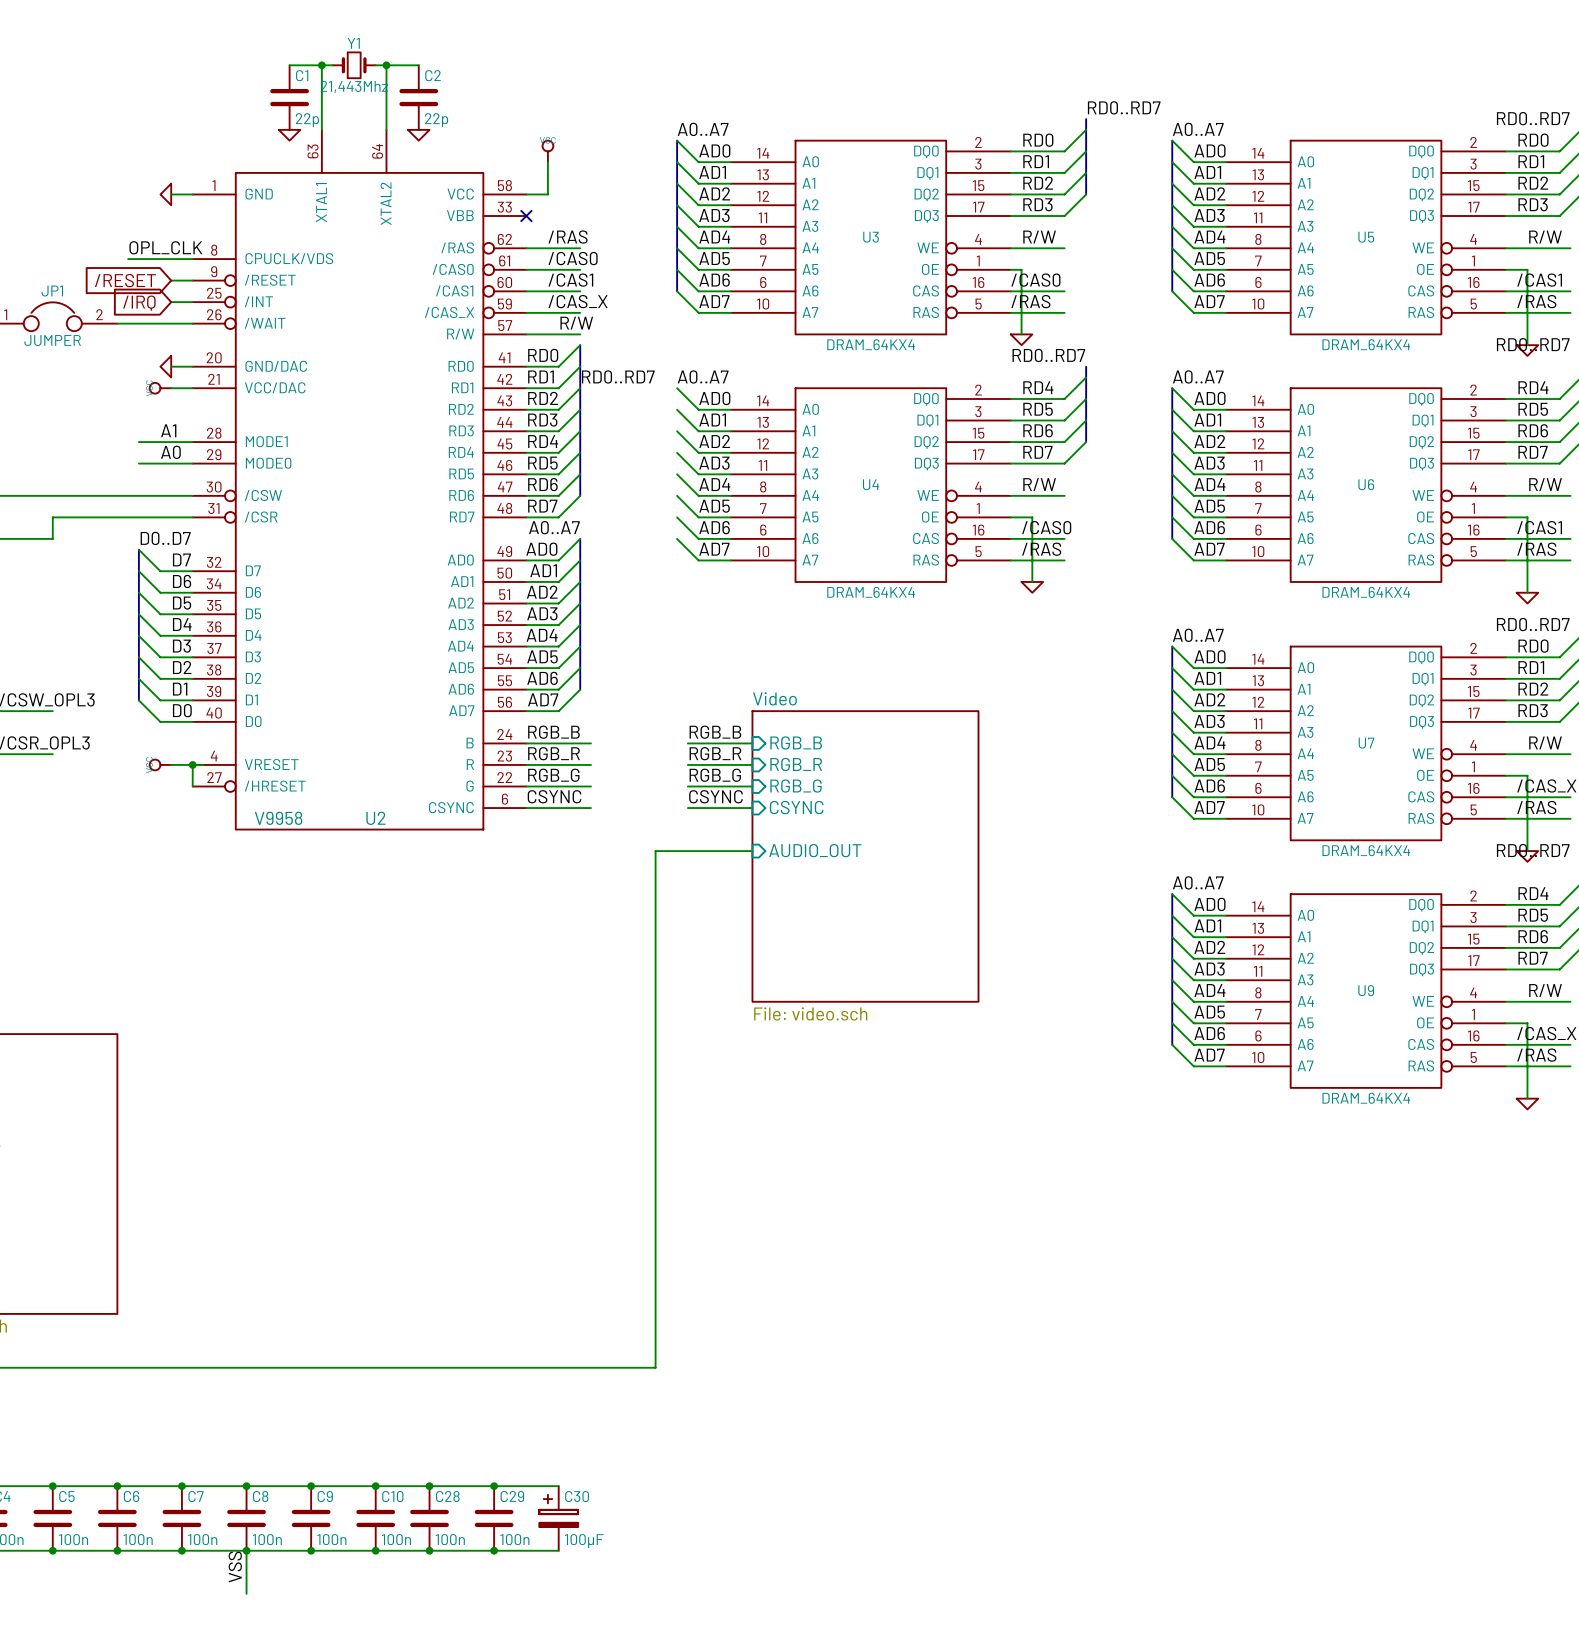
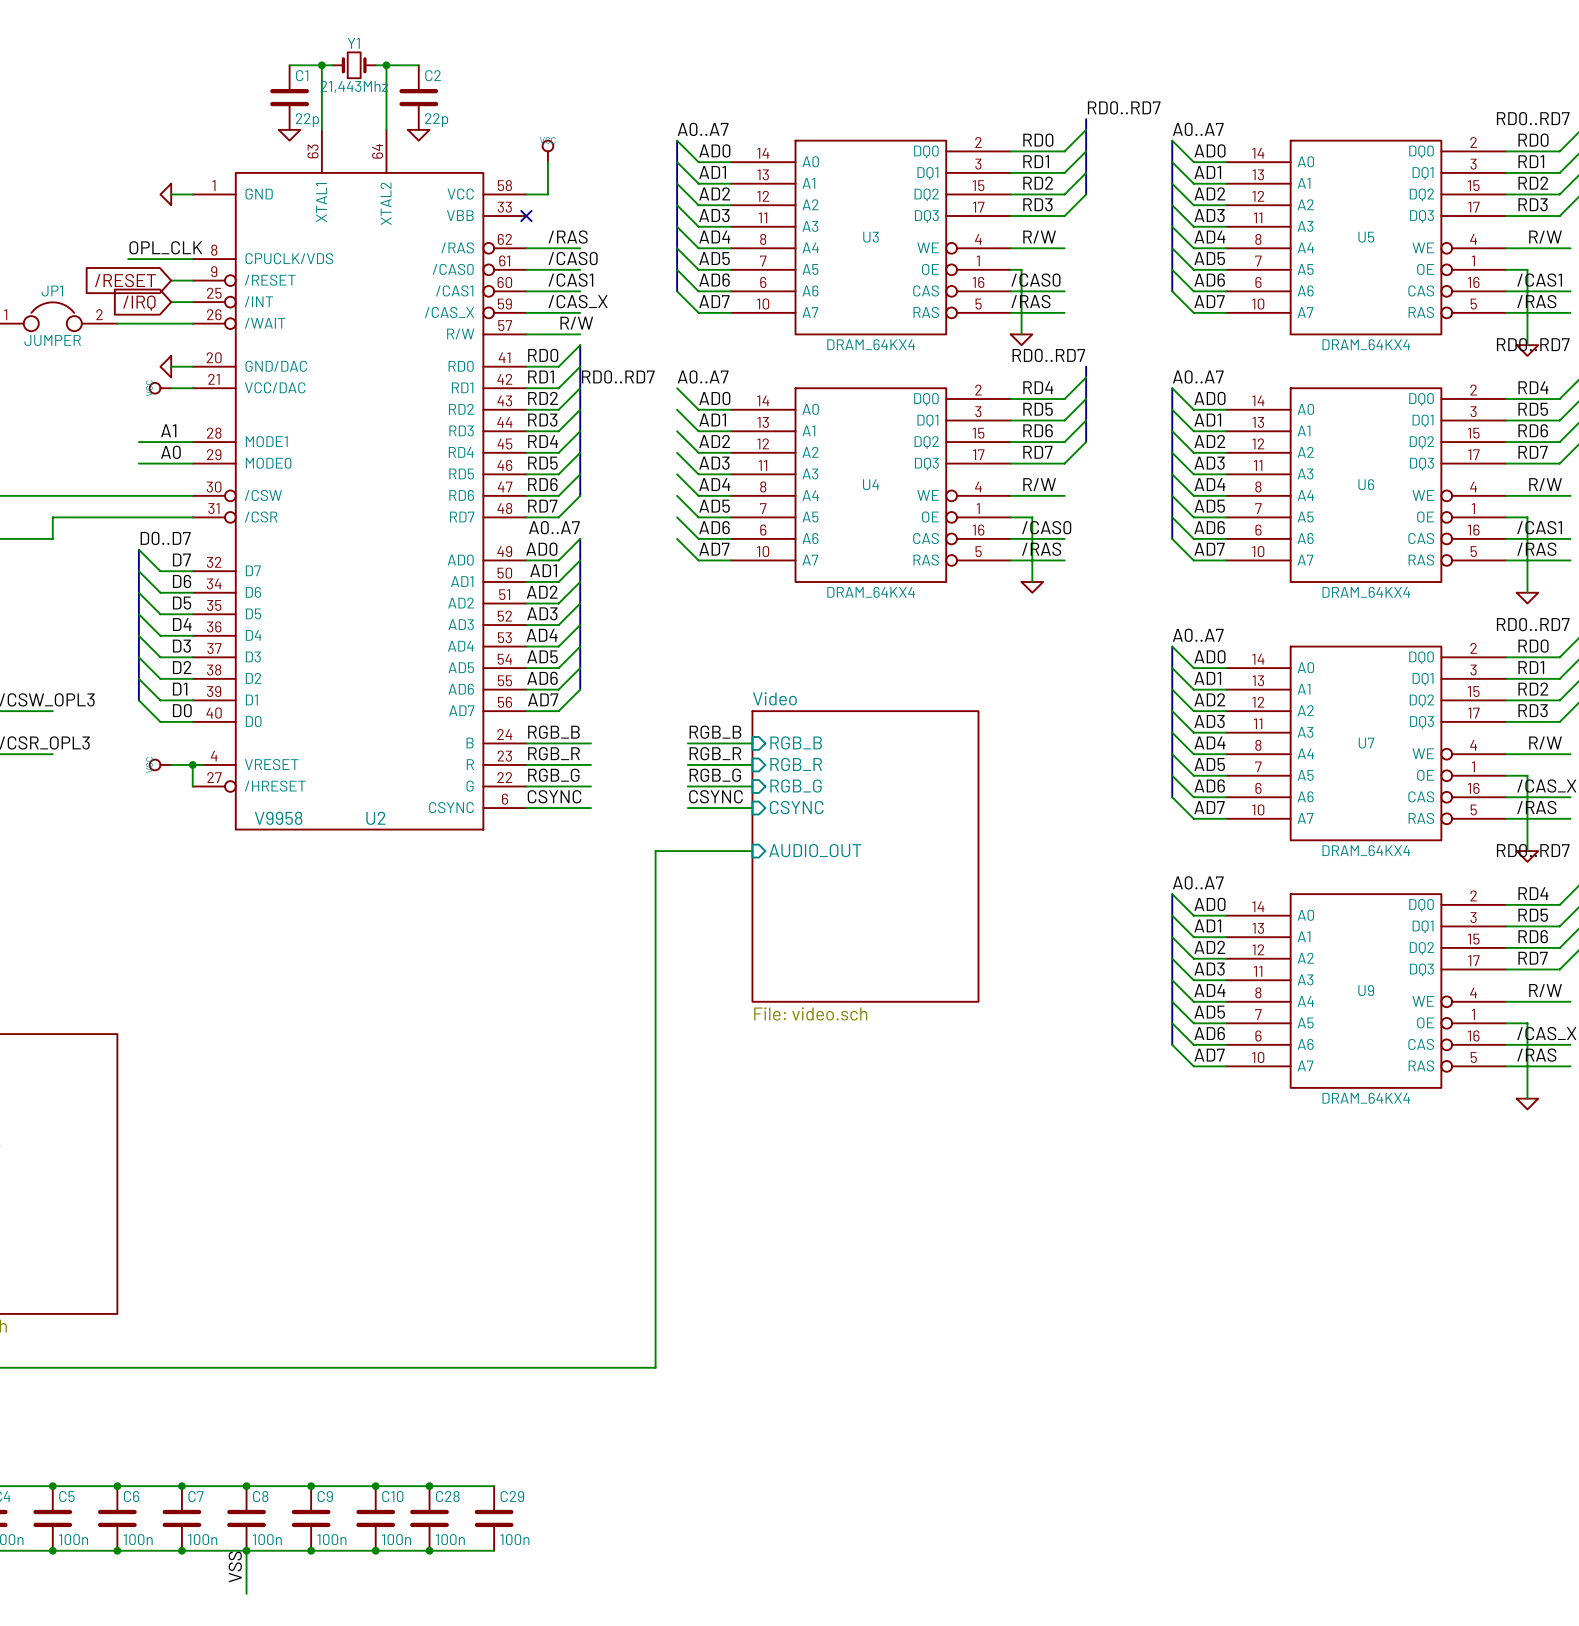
wire: (494, 1486) (558, 1486) -> none
junction: (494, 1486) -> none
C30: 100µF (558, 1518) -> none
wire: (494, 1550) (558, 1550) -> none
junction: (494, 1550) -> none

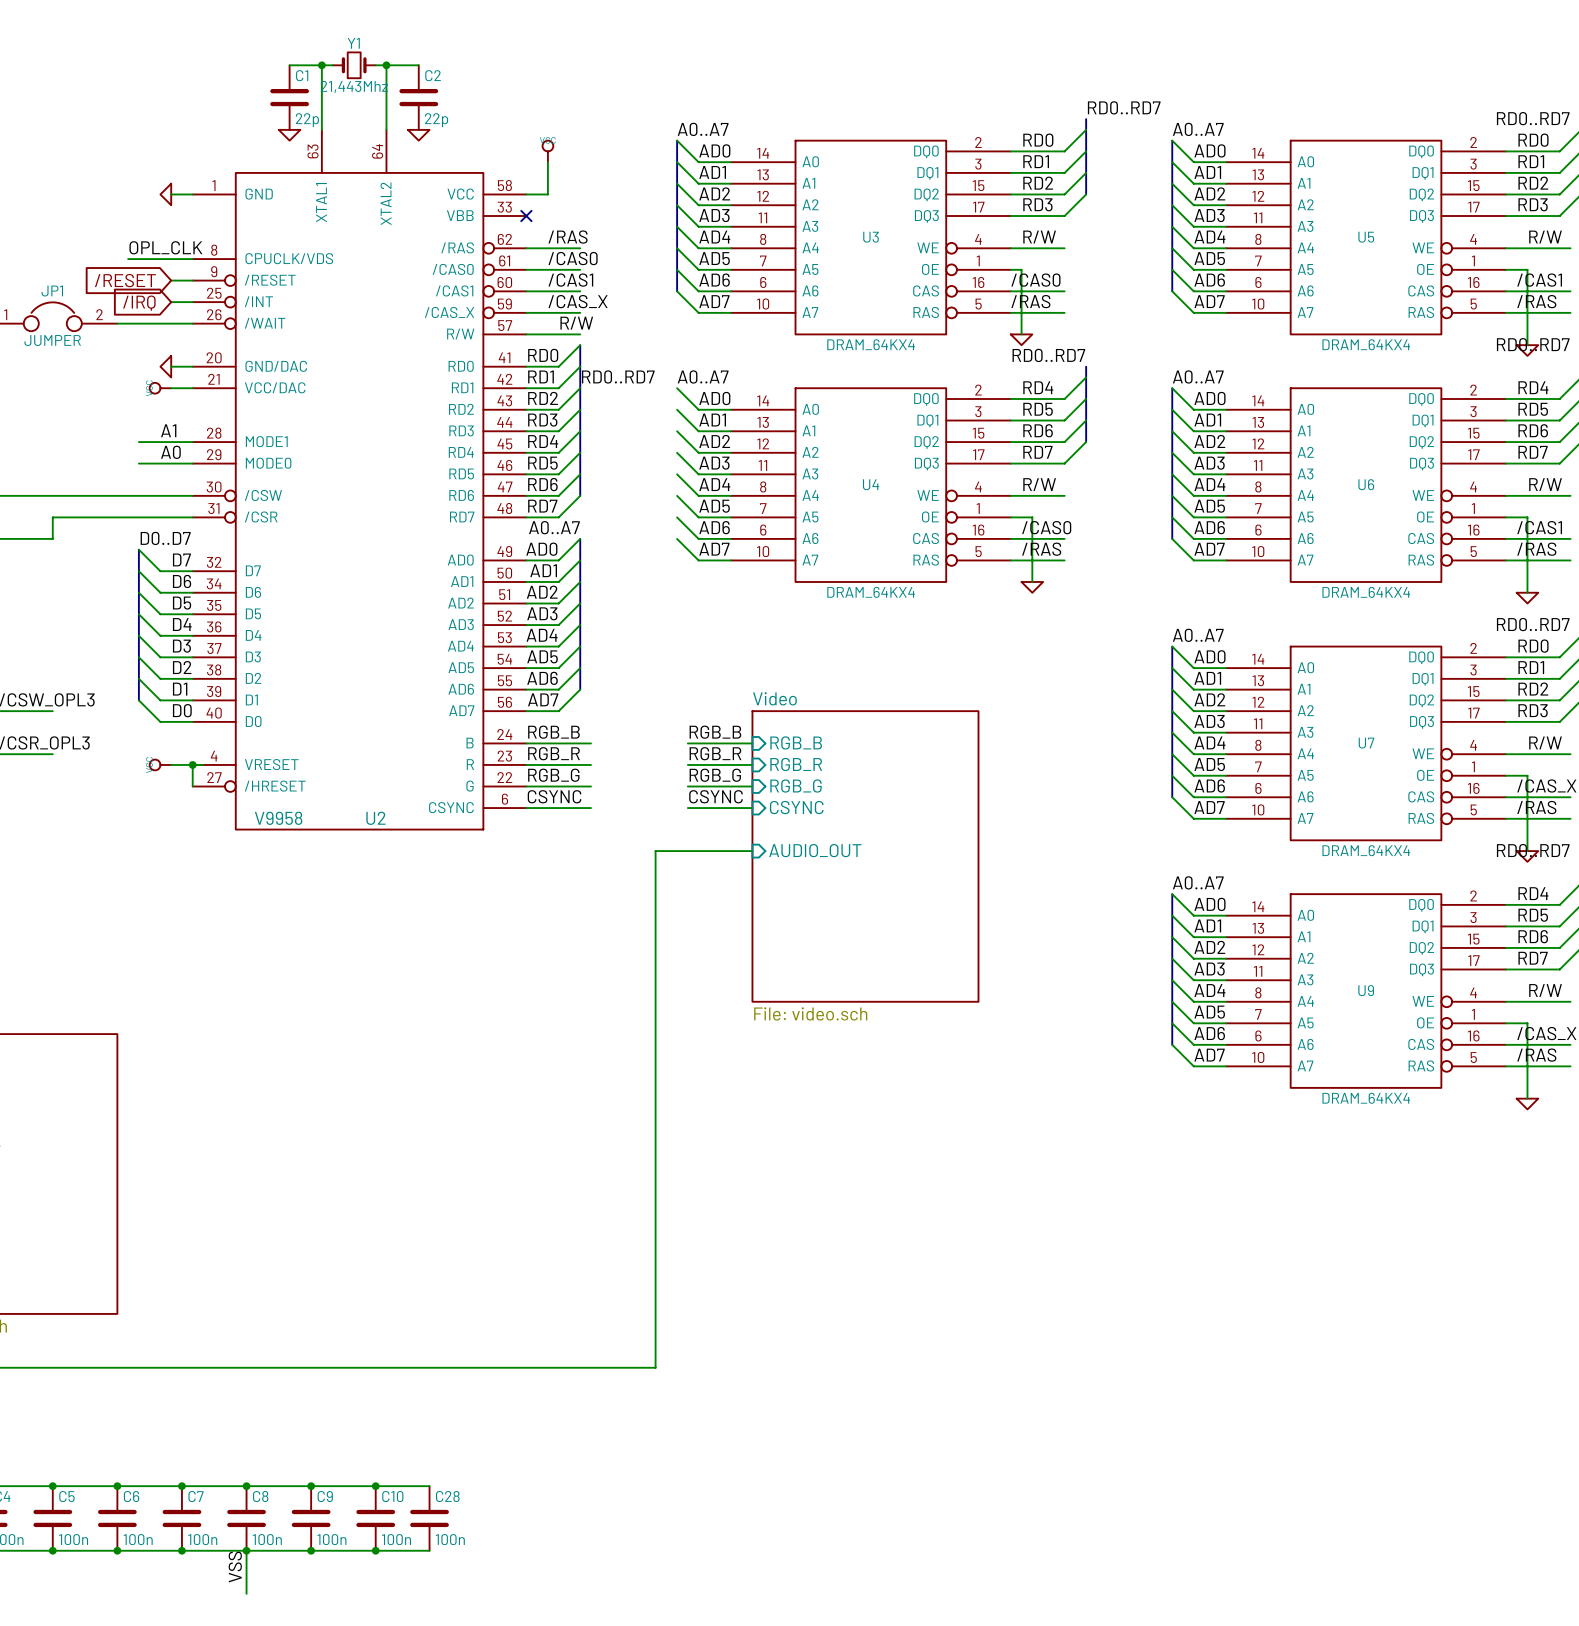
wire: (429, 1486) (494, 1486) -> none
junction: (429, 1486) -> none
C29: 100n (494, 1518) -> none
wire: (429, 1550) (494, 1550) -> none
junction: (429, 1550) -> none

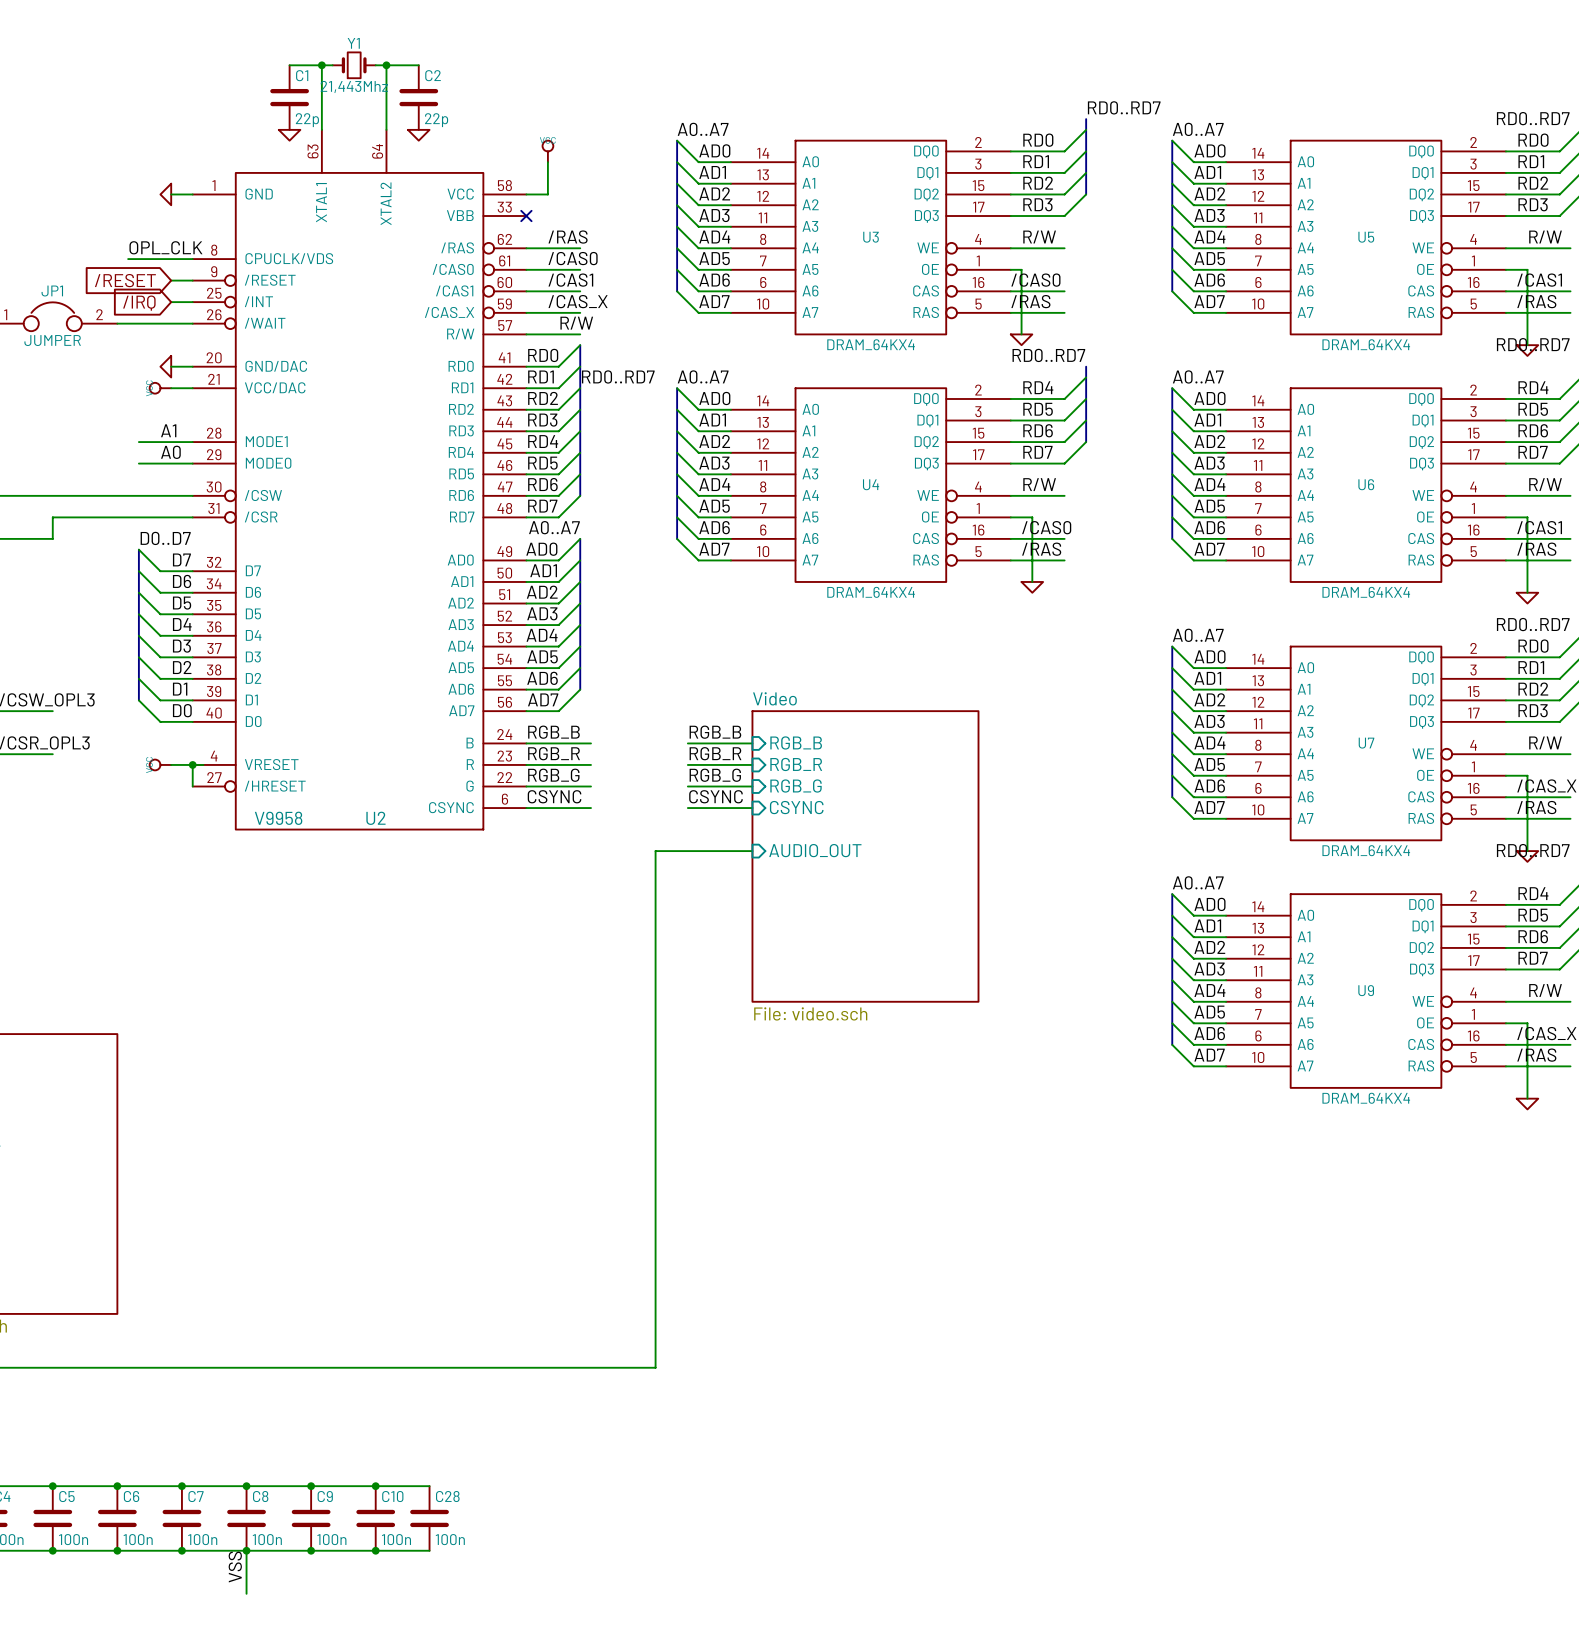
bus: none -> (677, 388) (677, 538)

